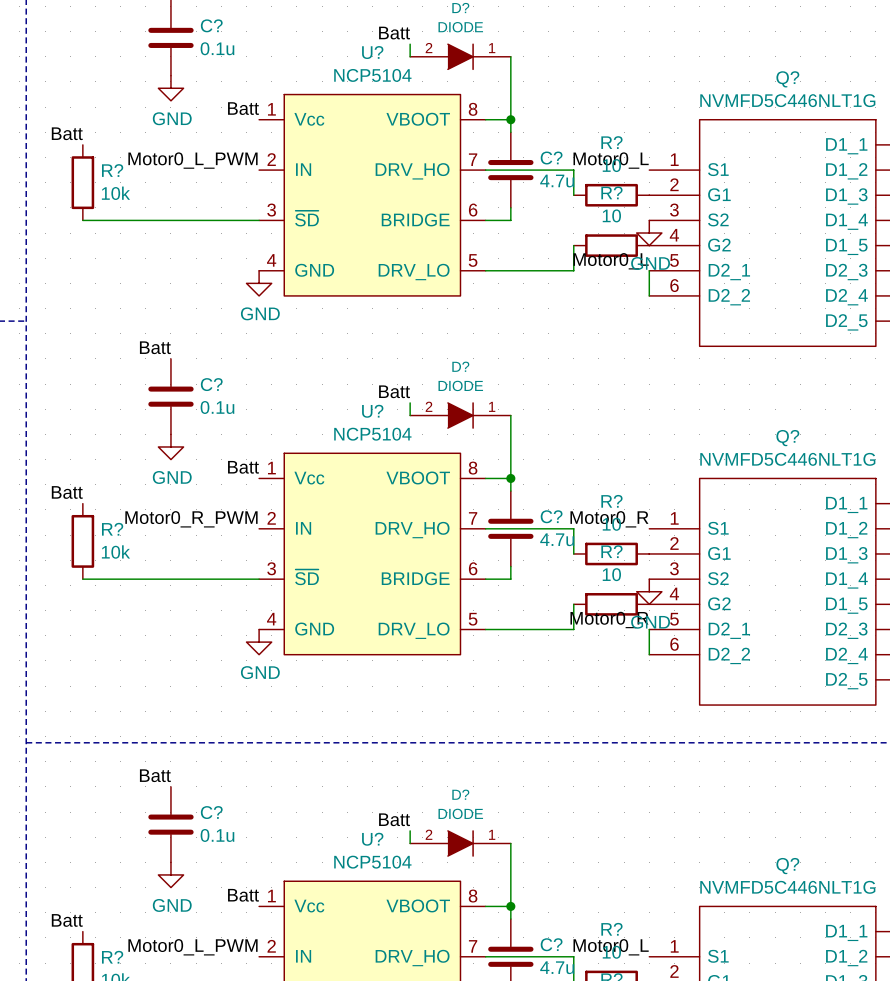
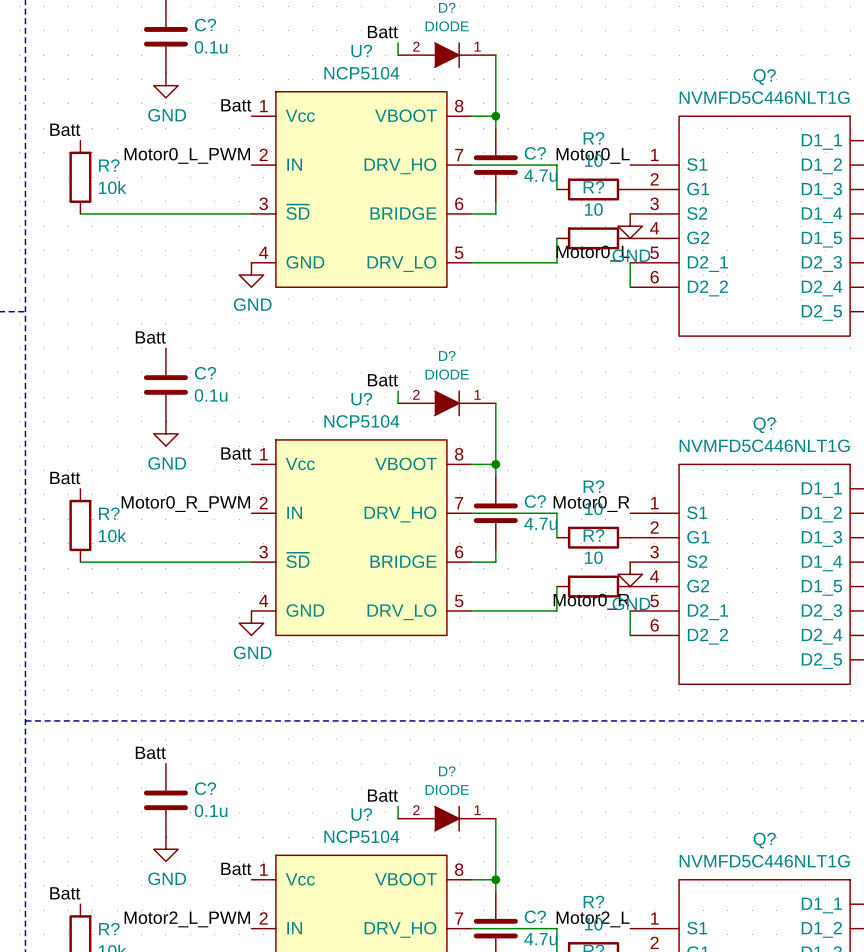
label: Motor0_L_PWM (192, 947) -> Motor2_L_PWM (187, 919)
label: Motor0_L (611, 947) -> Motor2_L (593, 919)

